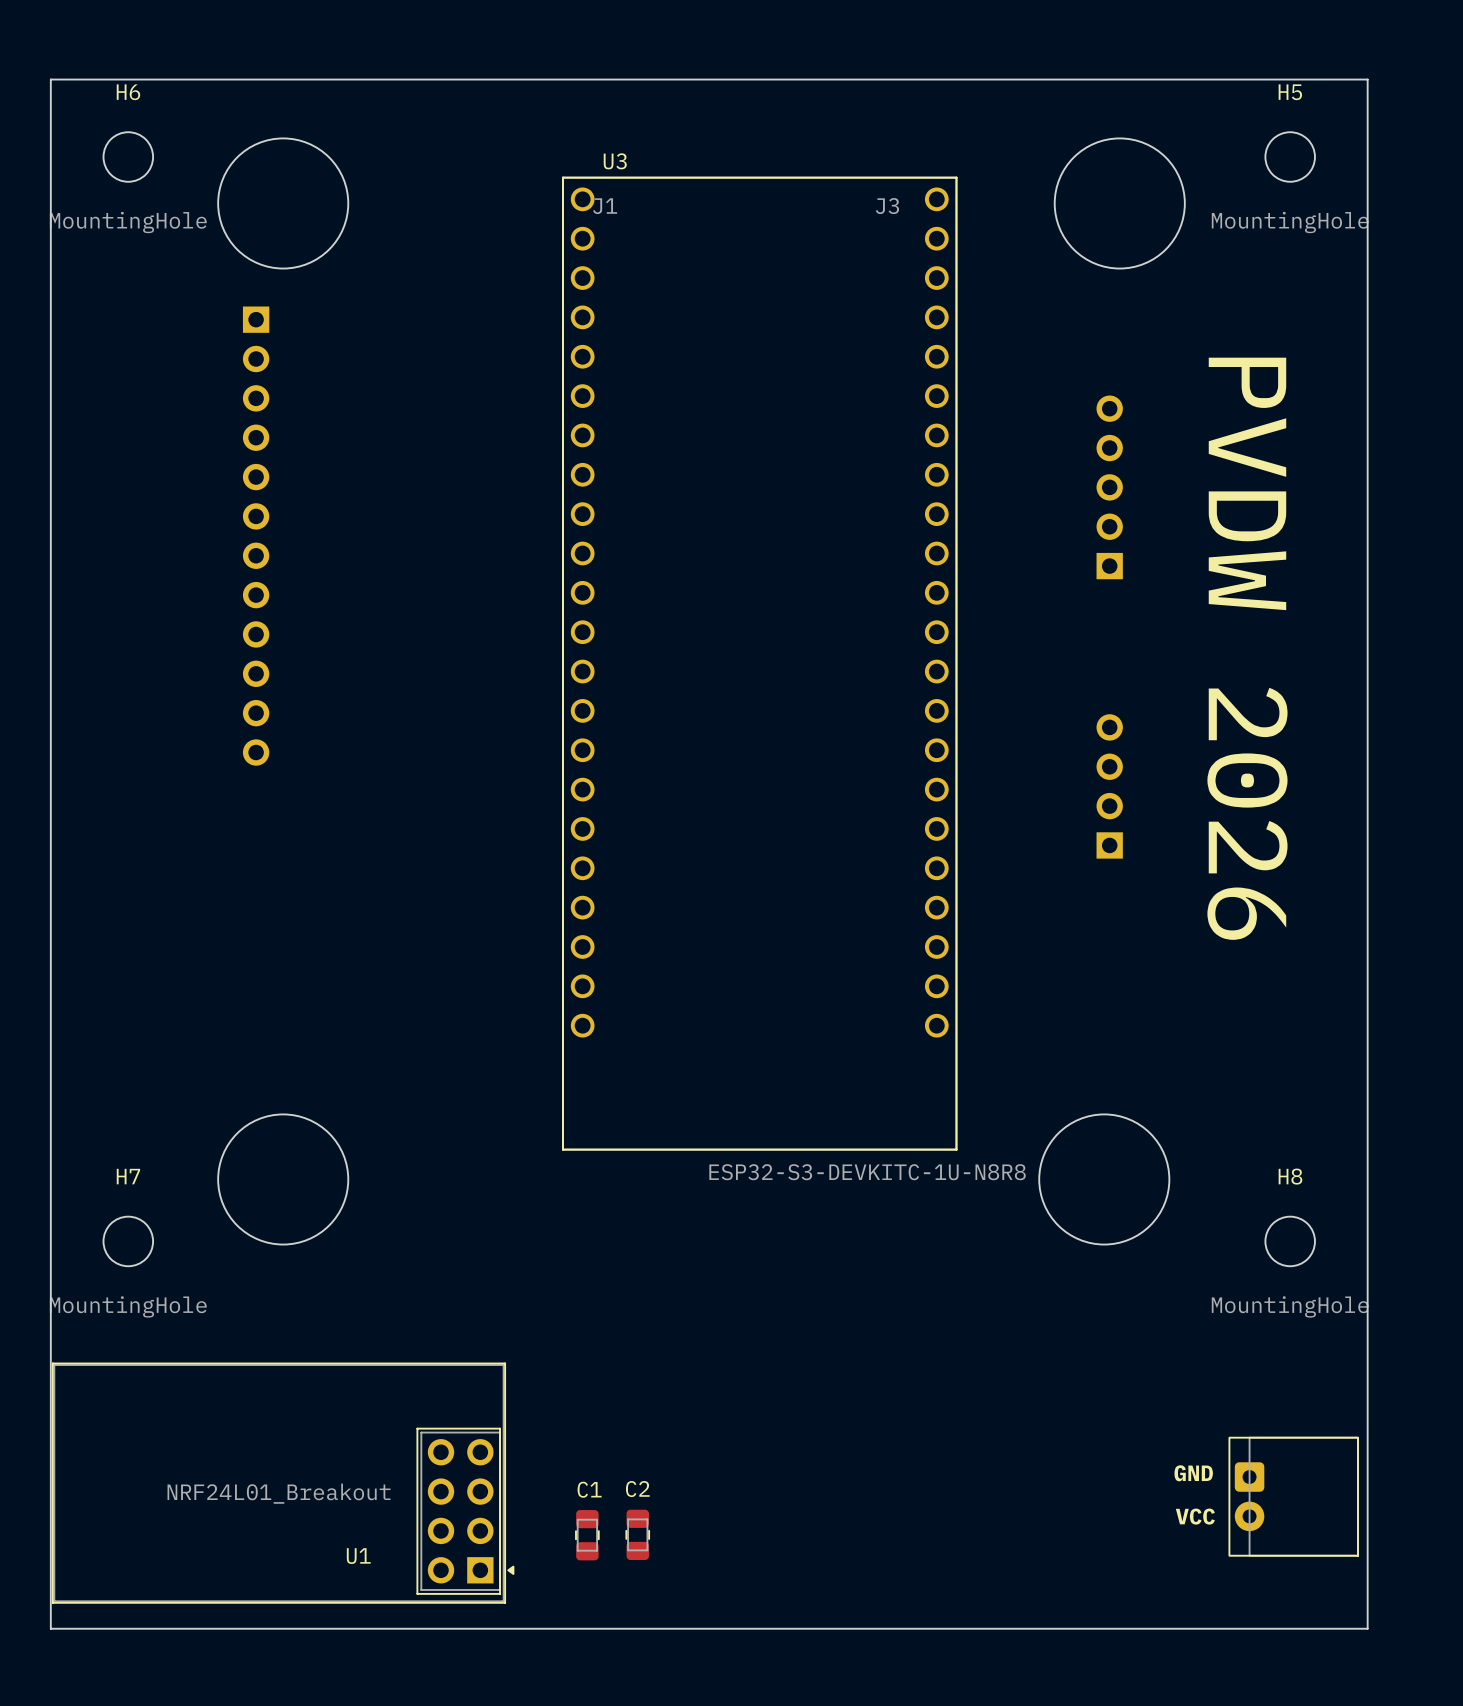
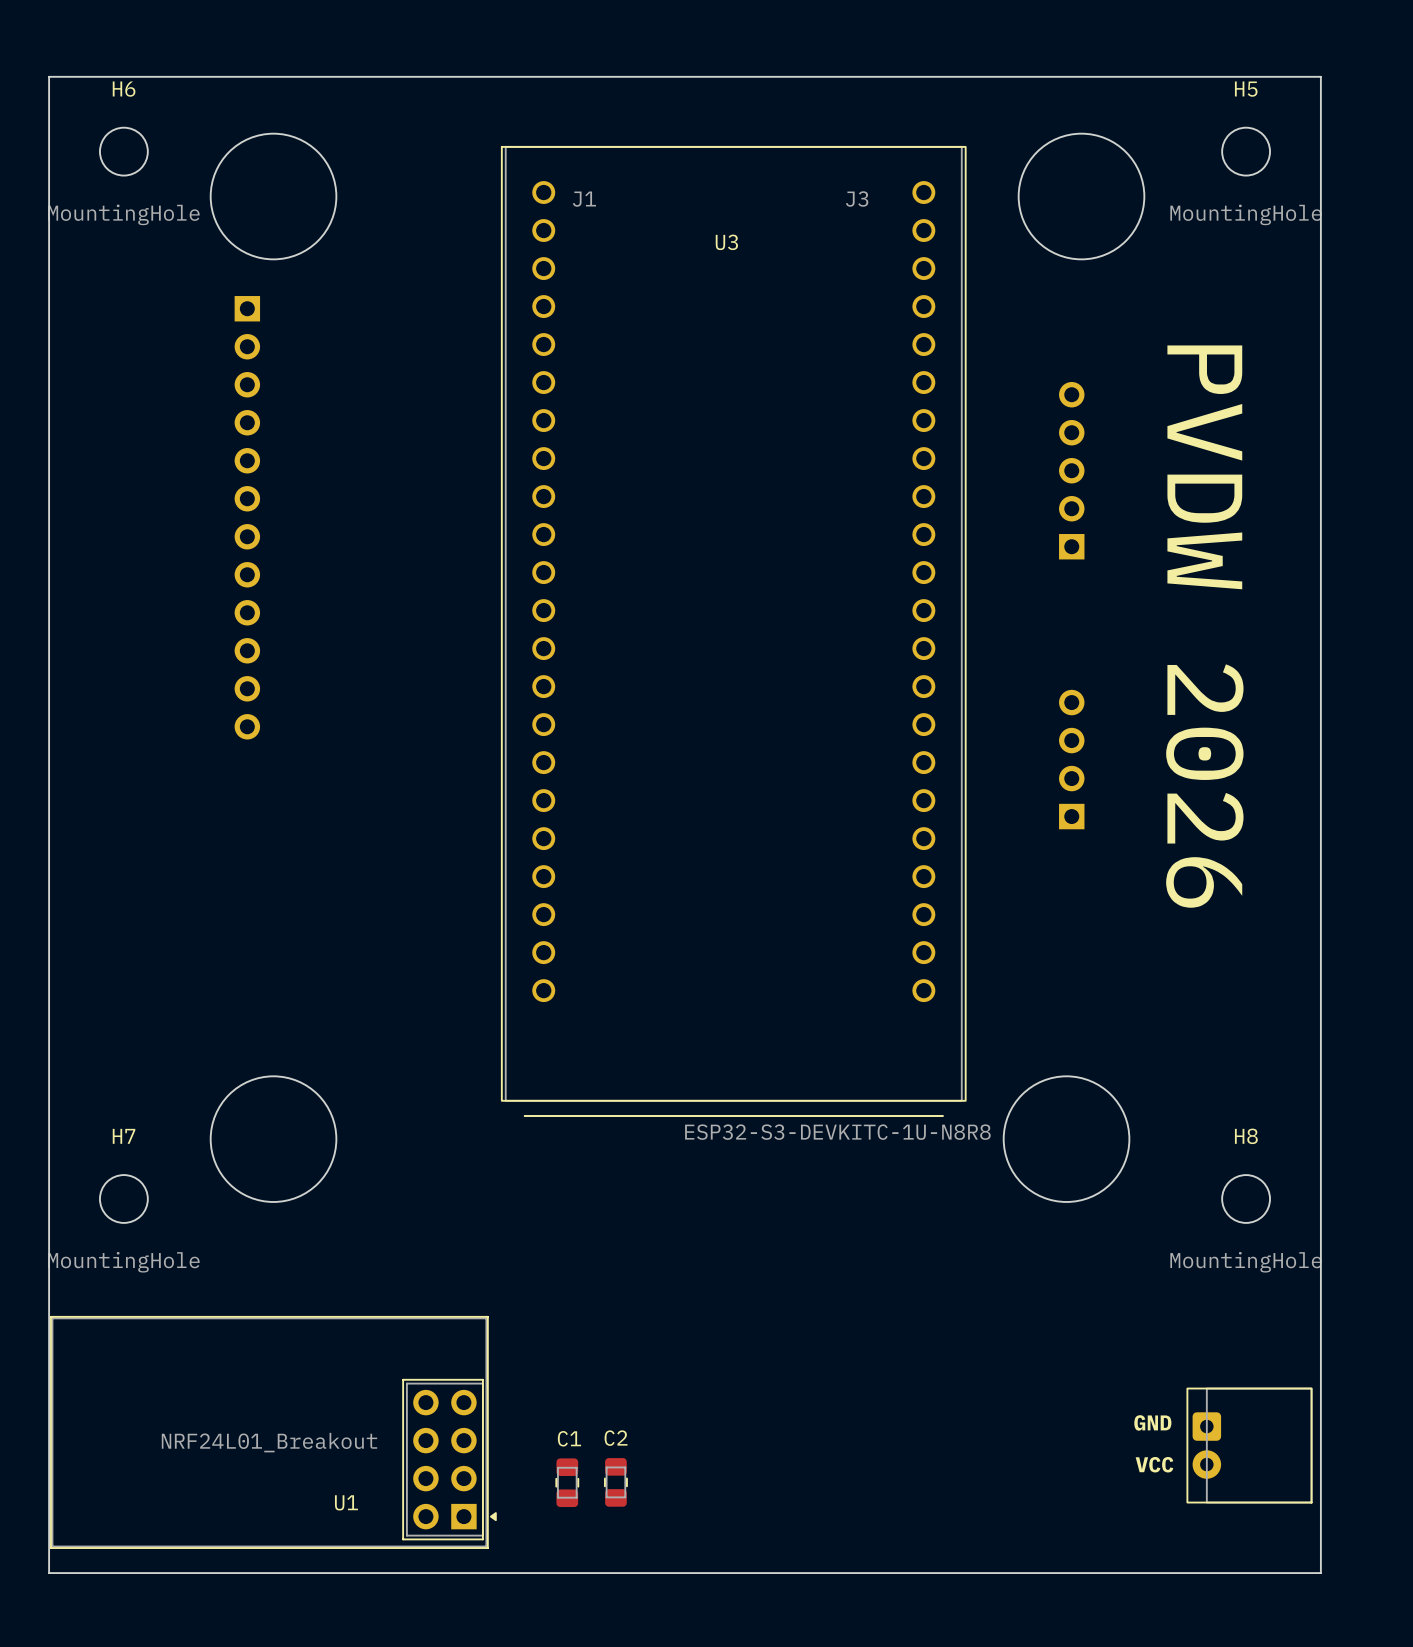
U3 name position: U3 (615, 161) -> U3 (726, 242)
U3 footprint: [562, 176, 958, 1151] -> [501, 146, 967, 1117]

